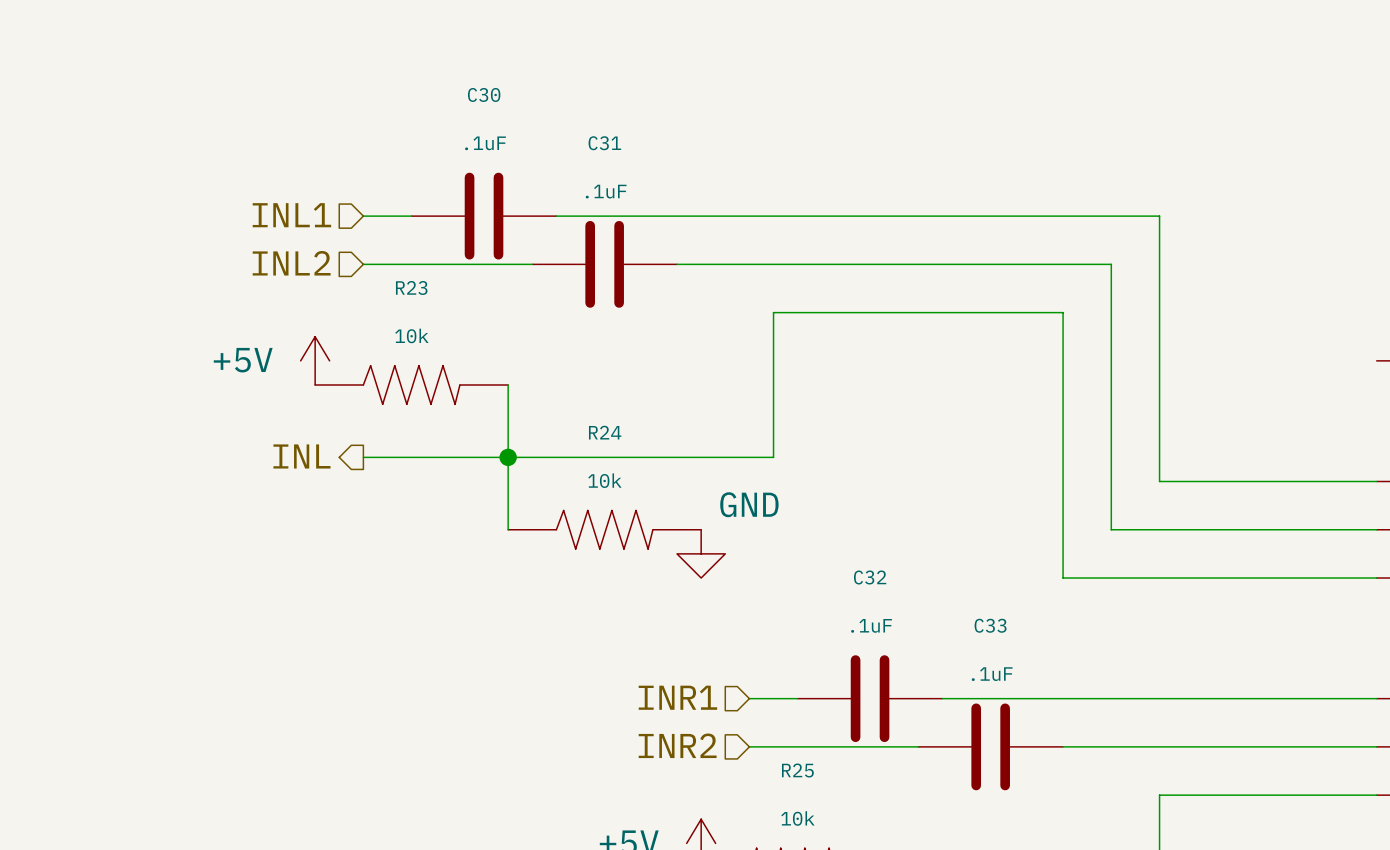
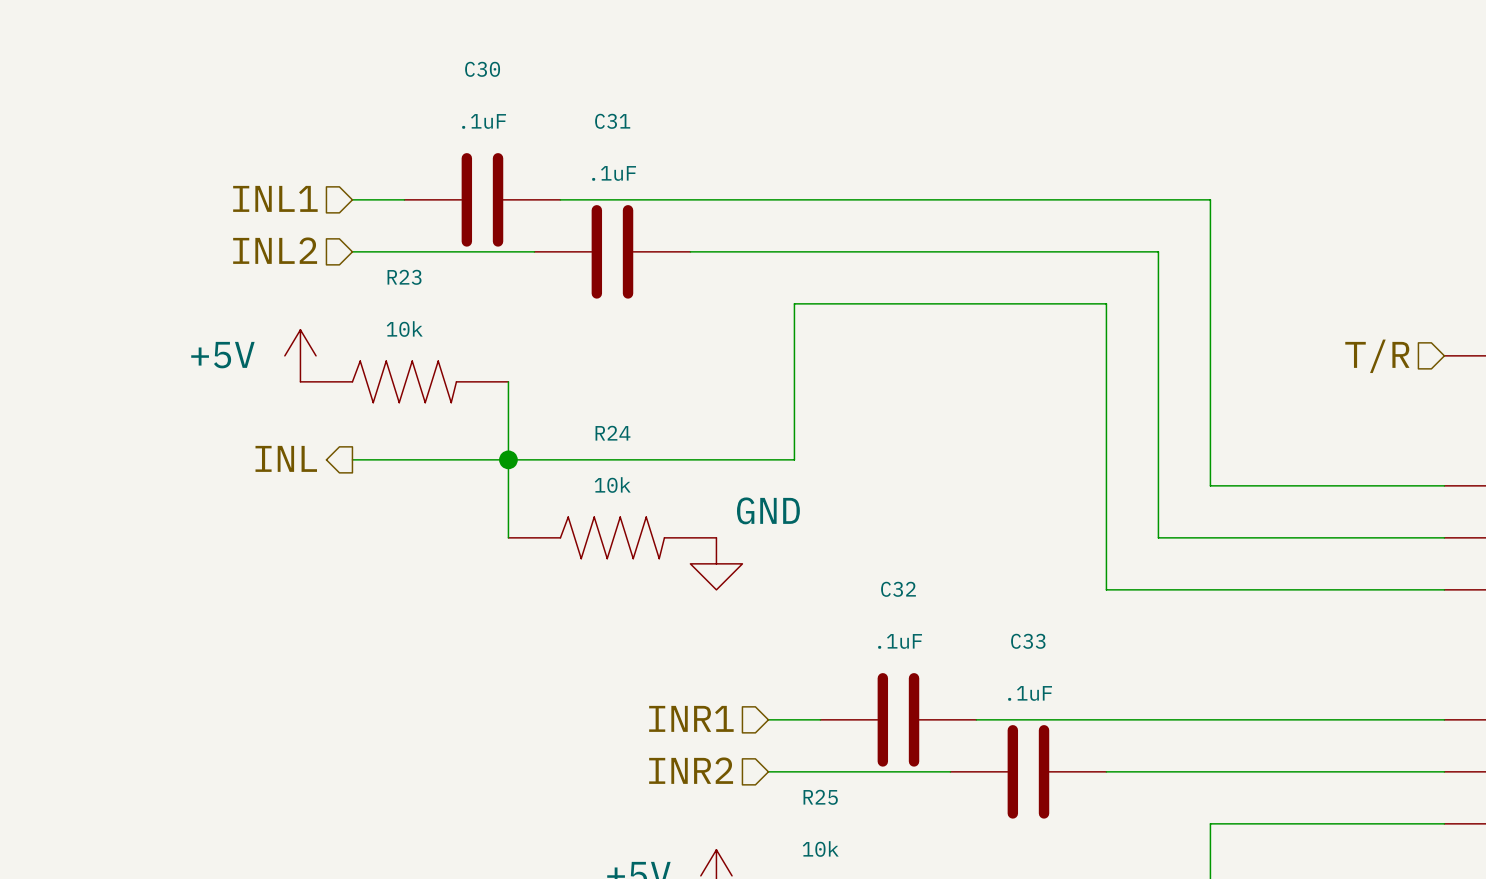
hierarchical label: none -> T/R (1377, 356)

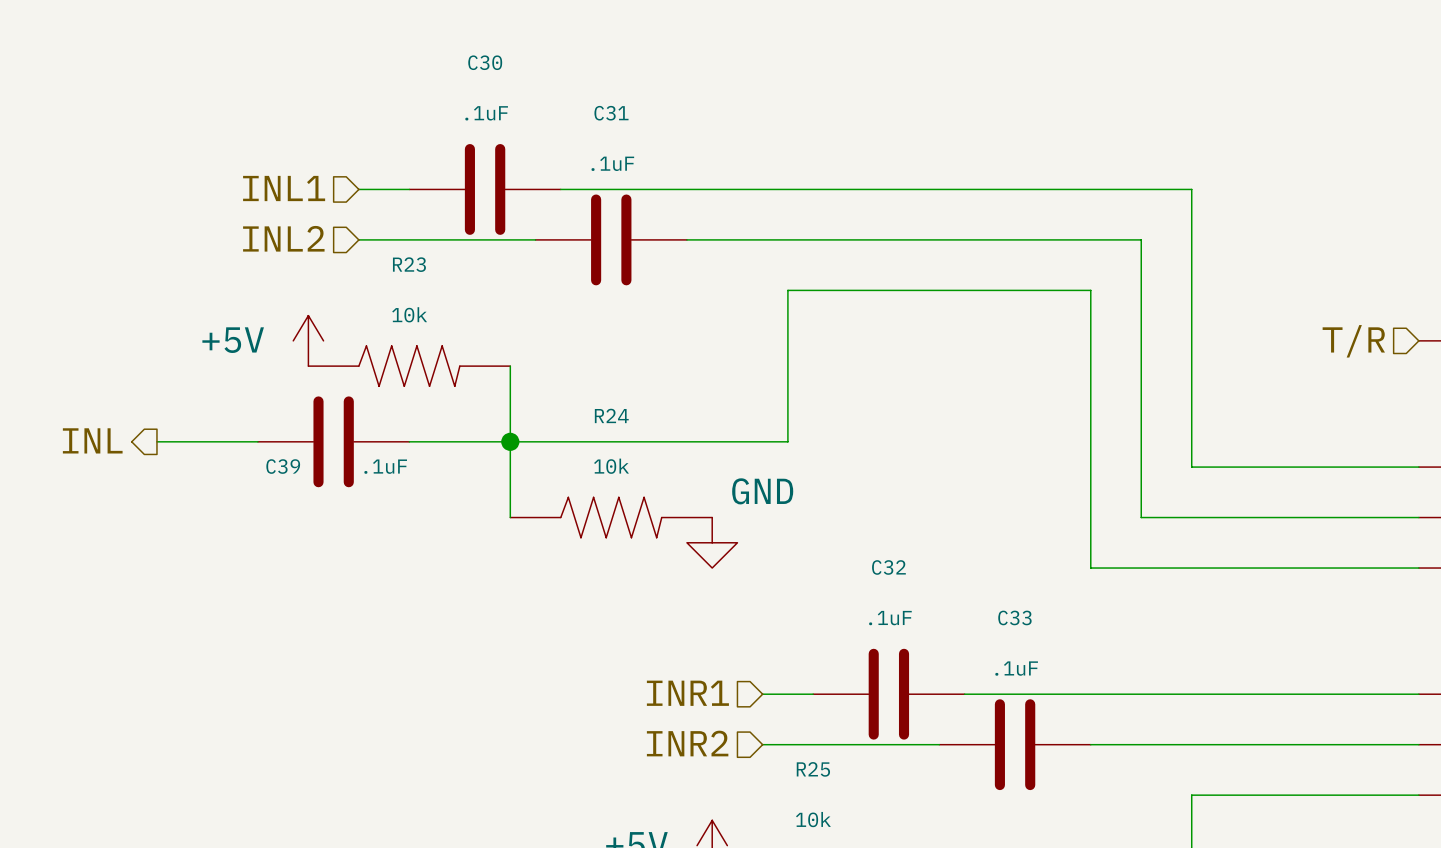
hierarchical label position: INL (286, 458) -> INL (92, 440)
wire: none -> (156, 441) (257, 441)
C39: none -> .1uF (333, 441)

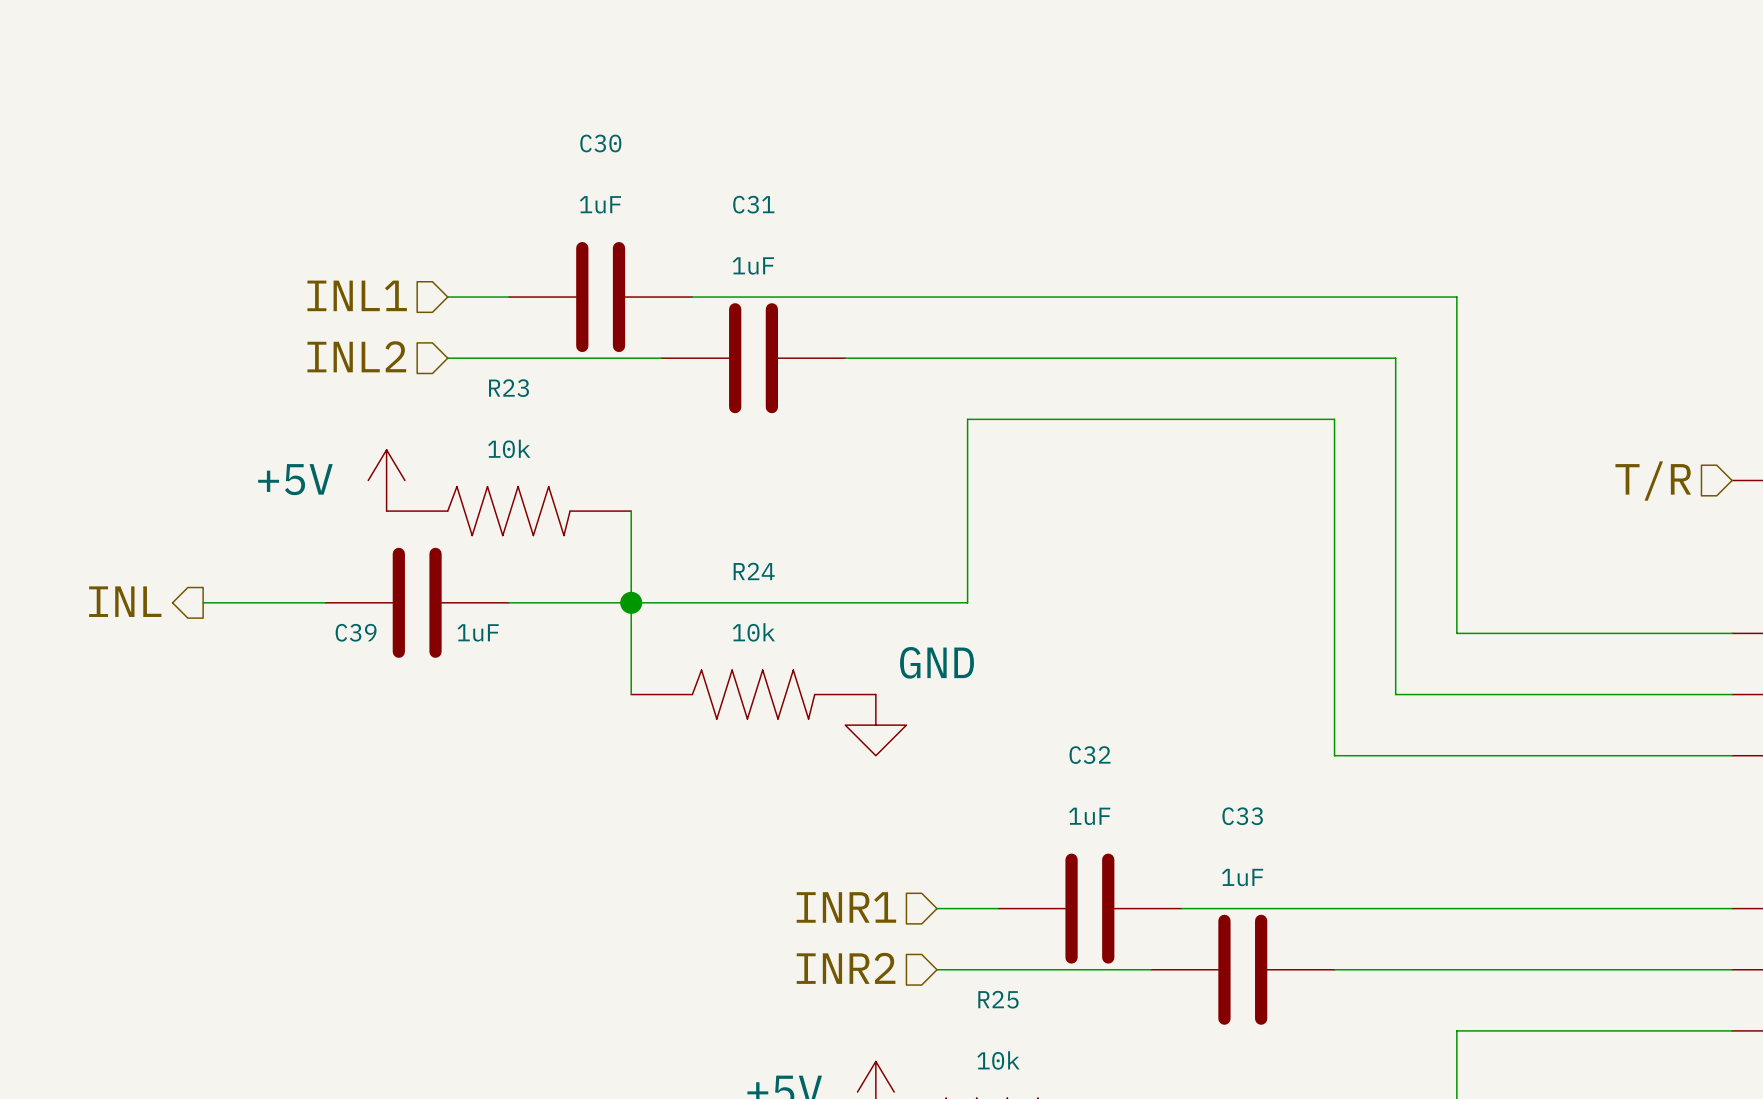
C30 value: .1uF (486, 113) -> 1uF (600, 204)
C31 value: .1uF (612, 163) -> 1uF (753, 265)
C39 value: .1uF (385, 466) -> 1uF (478, 632)
C32 value: .1uF (890, 618) -> 1uF (1089, 816)
C33 value: .1uF (1016, 668) -> 1uF (1242, 877)

